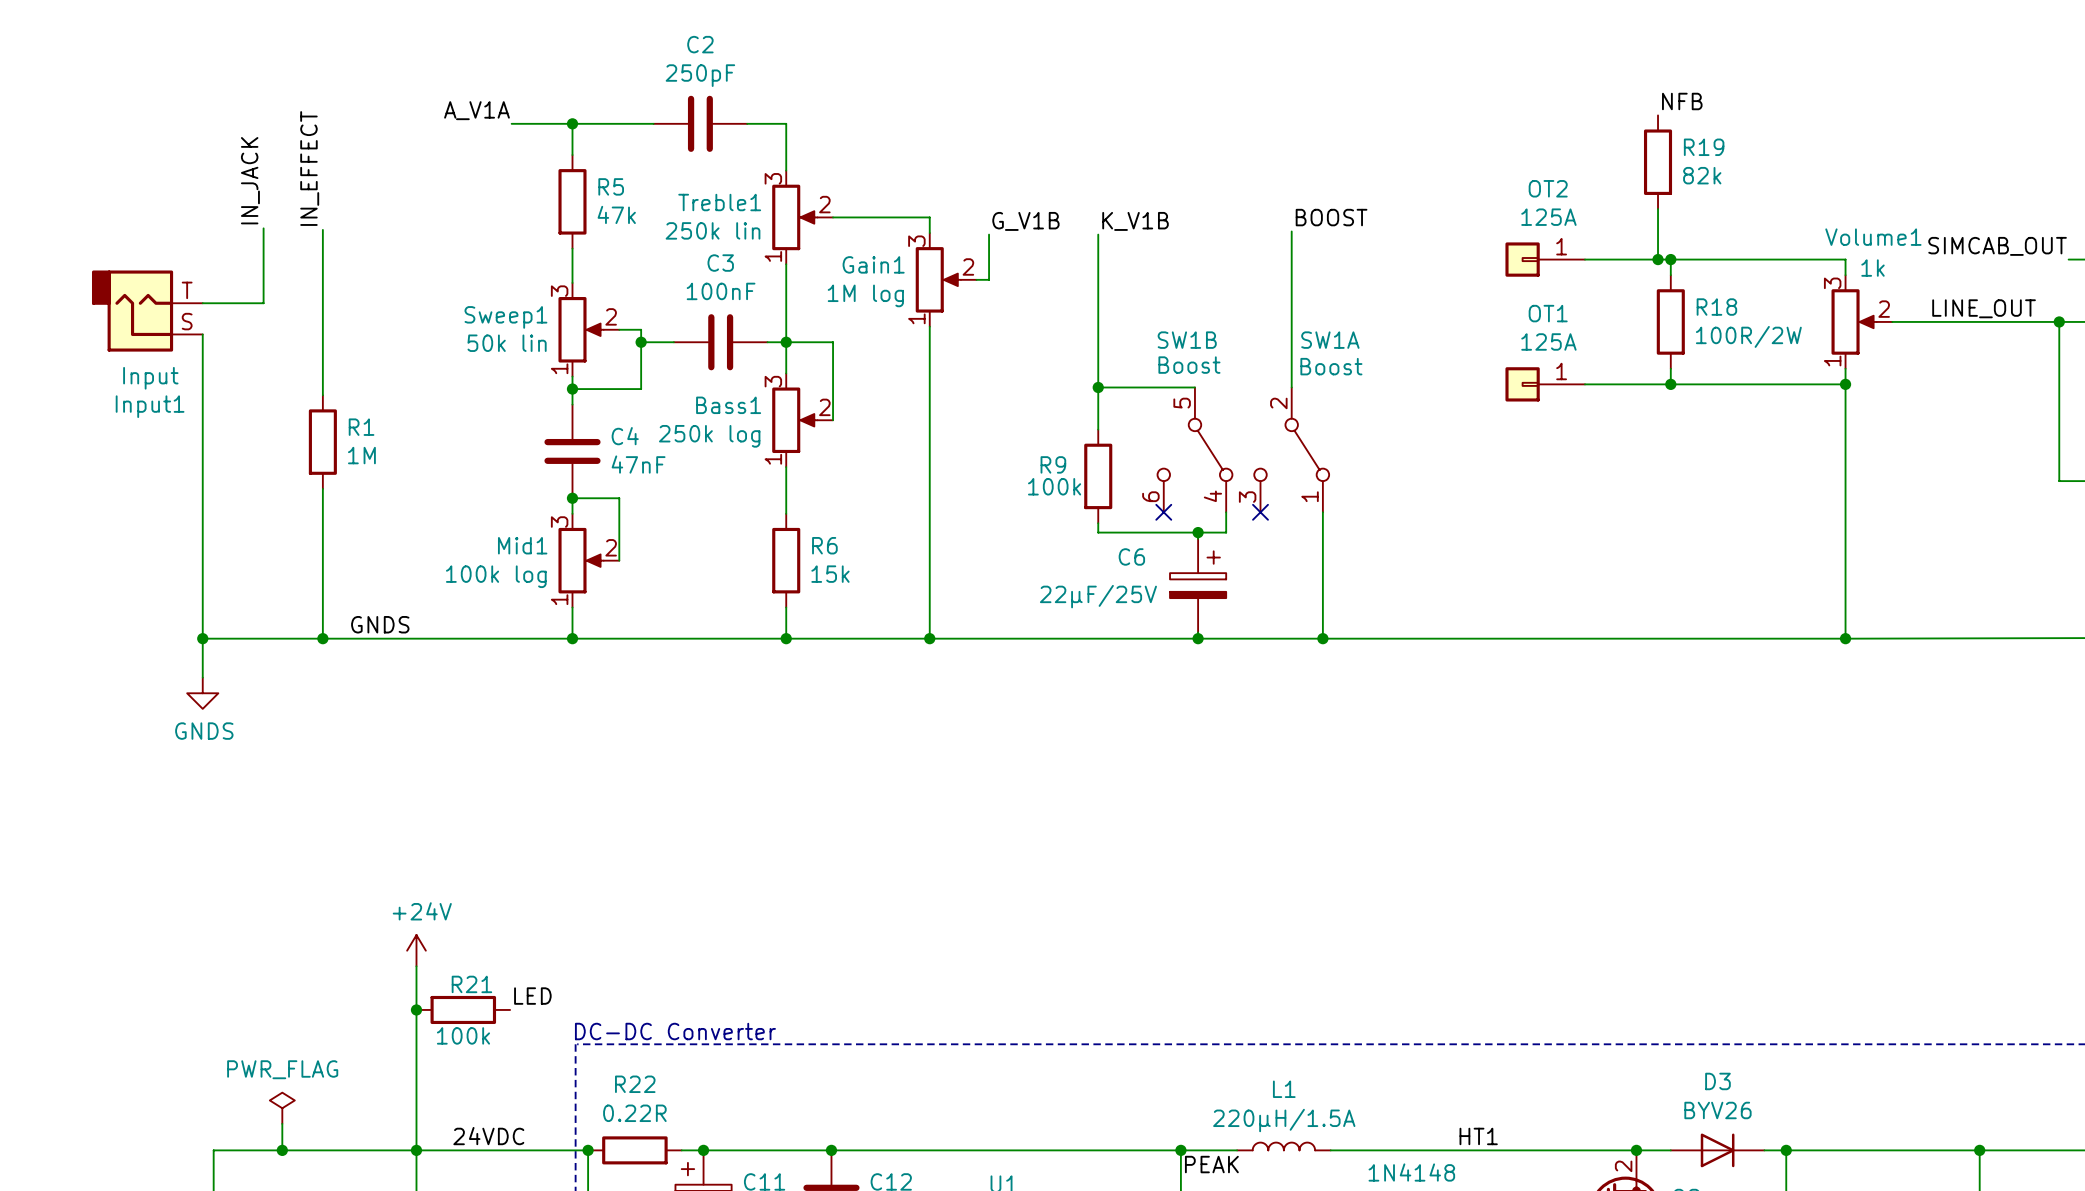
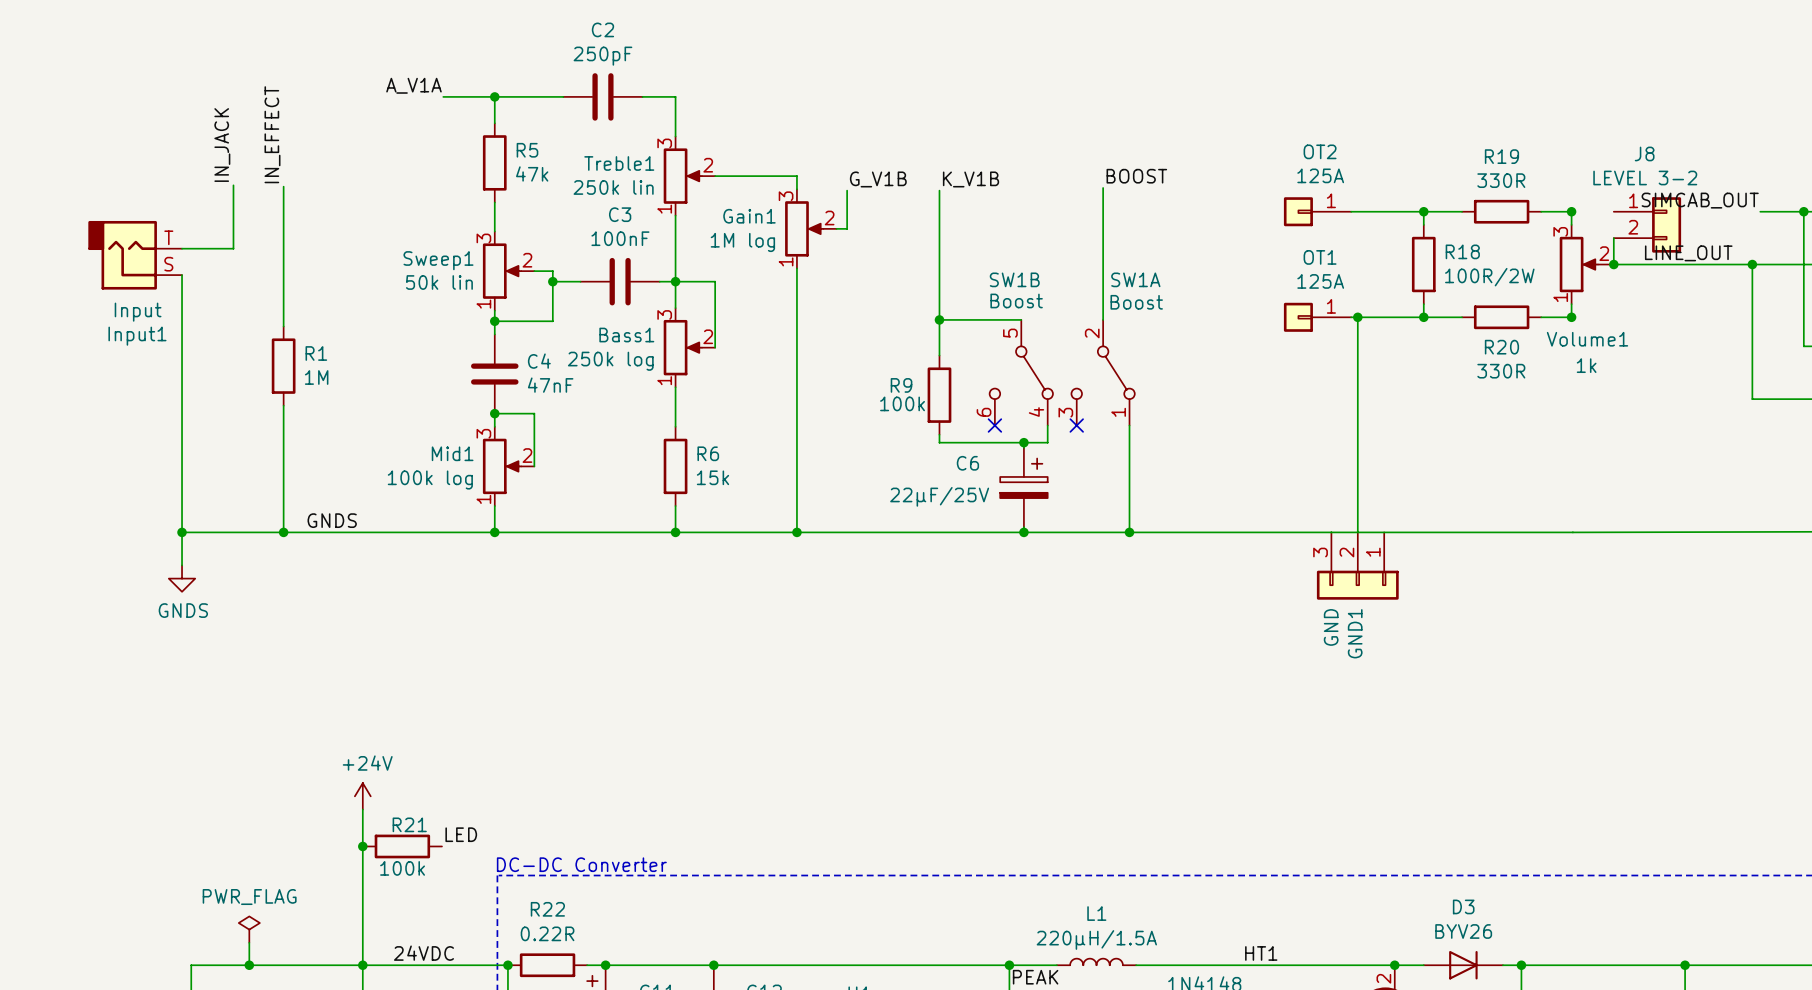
label: NFB (1682, 101) -> none
R19 name position: R19 (1704, 147) -> R19 (1501, 156)
R19 rotation: 0° (1658, 162) -> 90° clockwise (1501, 211)
R19 position: (1658, 162) -> (1501, 211)
R19 value: 82k (1702, 175) -> 330R (1501, 180)
wire: (1658, 209) (1658, 259) -> none
Volume1 name position: Volume1 (1873, 237) -> Volume1 (1587, 339)
junction: (1658, 259) -> none
wire: (1716, 259) (1809, 259) -> none
junction: none -> (1571, 211)
Volume1 value position: 1k (1872, 268) -> 1k (1586, 365)
J8: none -> LEVEL 3-2 (1647, 224)
wire: none -> (1613, 238) (1613, 264)
junction: none -> (1613, 264)
junction: none -> (1357, 317)
wire: (1716, 384) (1809, 384) -> none
R20: none -> 330R (1501, 317)
wire: (1845, 384) (1845, 638) -> (1357, 317) (1357, 532)
junction: (1845, 638) -> none
GND1: none -> GND (1357, 566)

